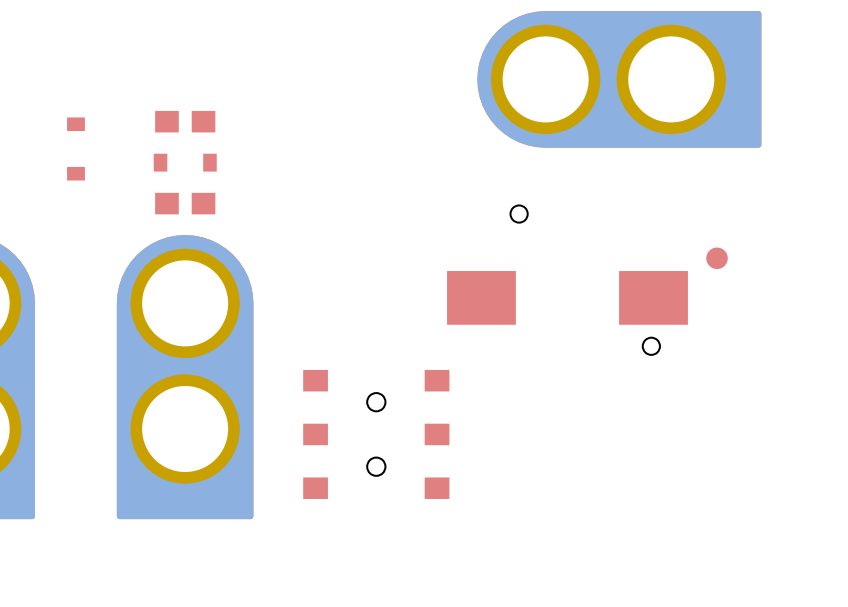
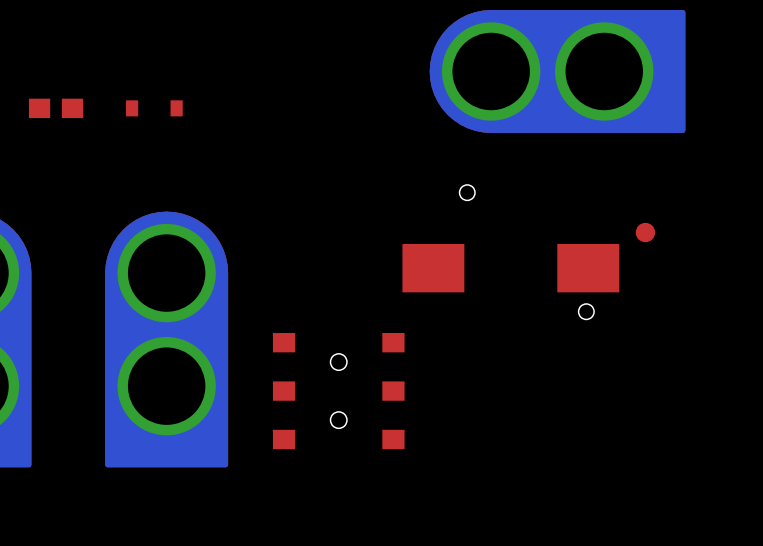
part footprint: [155, 110, 216, 133] -> [126, 100, 183, 117]
part: none -> (56, 108)
part: (76, 148) -> none
part: (185, 162) -> none
part: (185, 203) -> none

